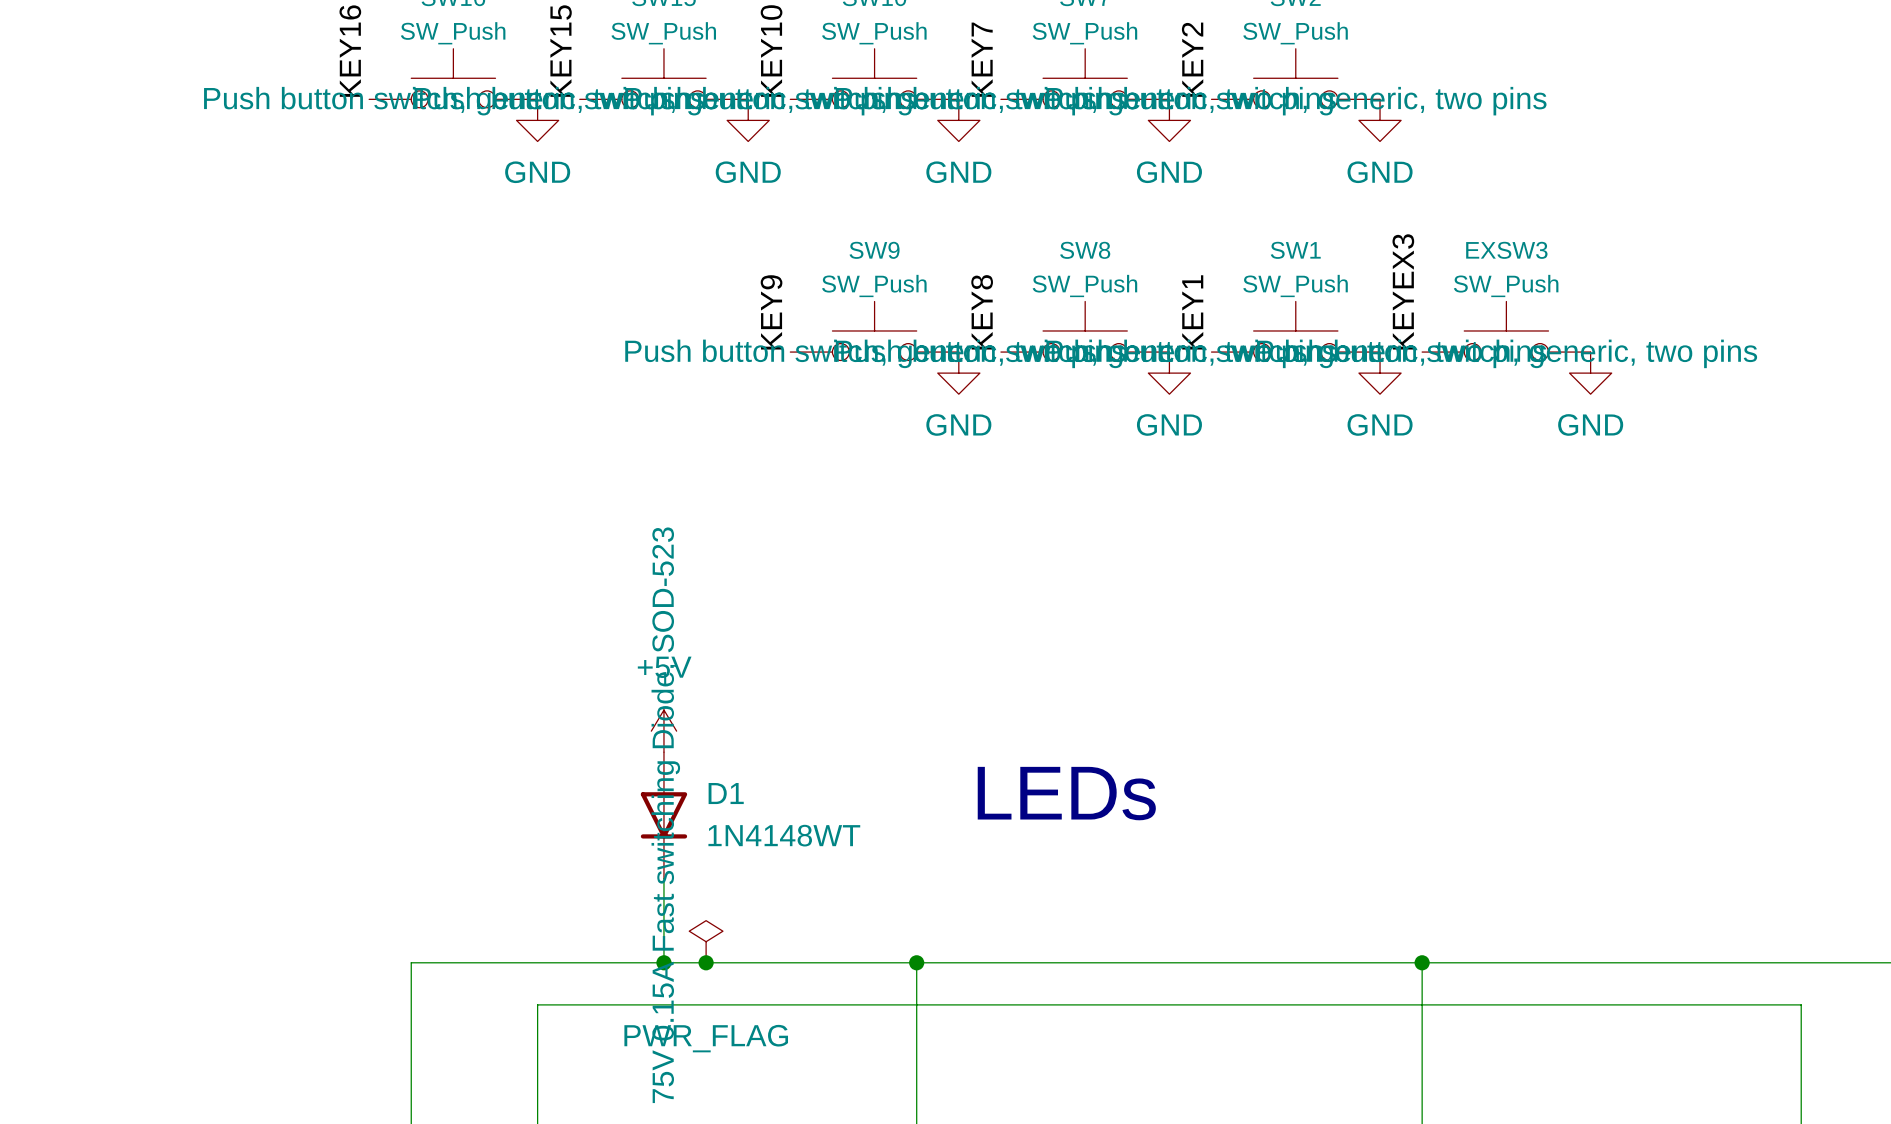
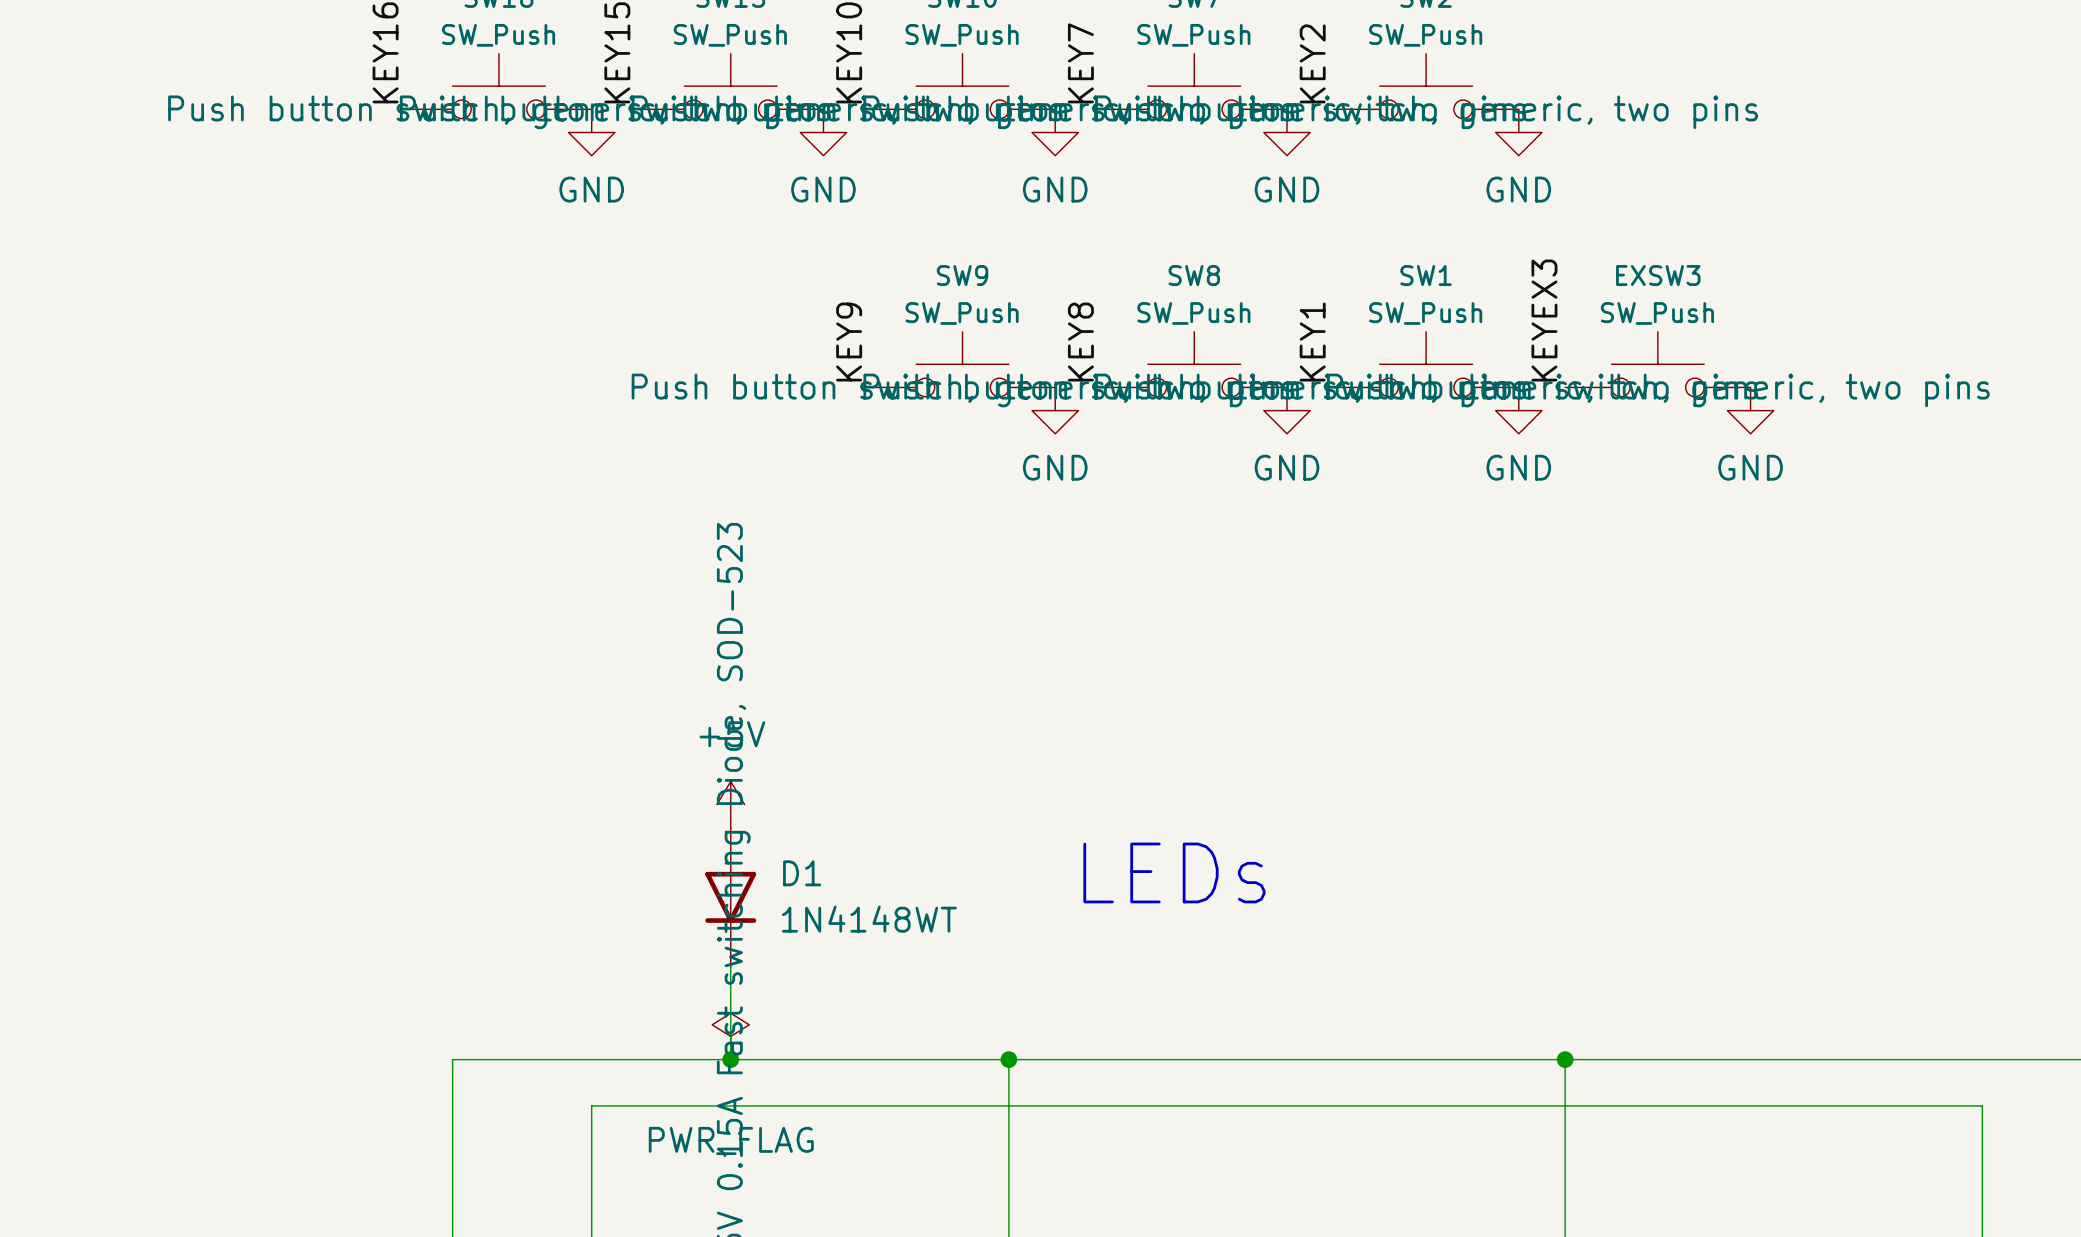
power symbol position: PWR_FLAG (706, 941) -> PWR_FLAG (730, 1036)
junction: (706, 962) -> none

